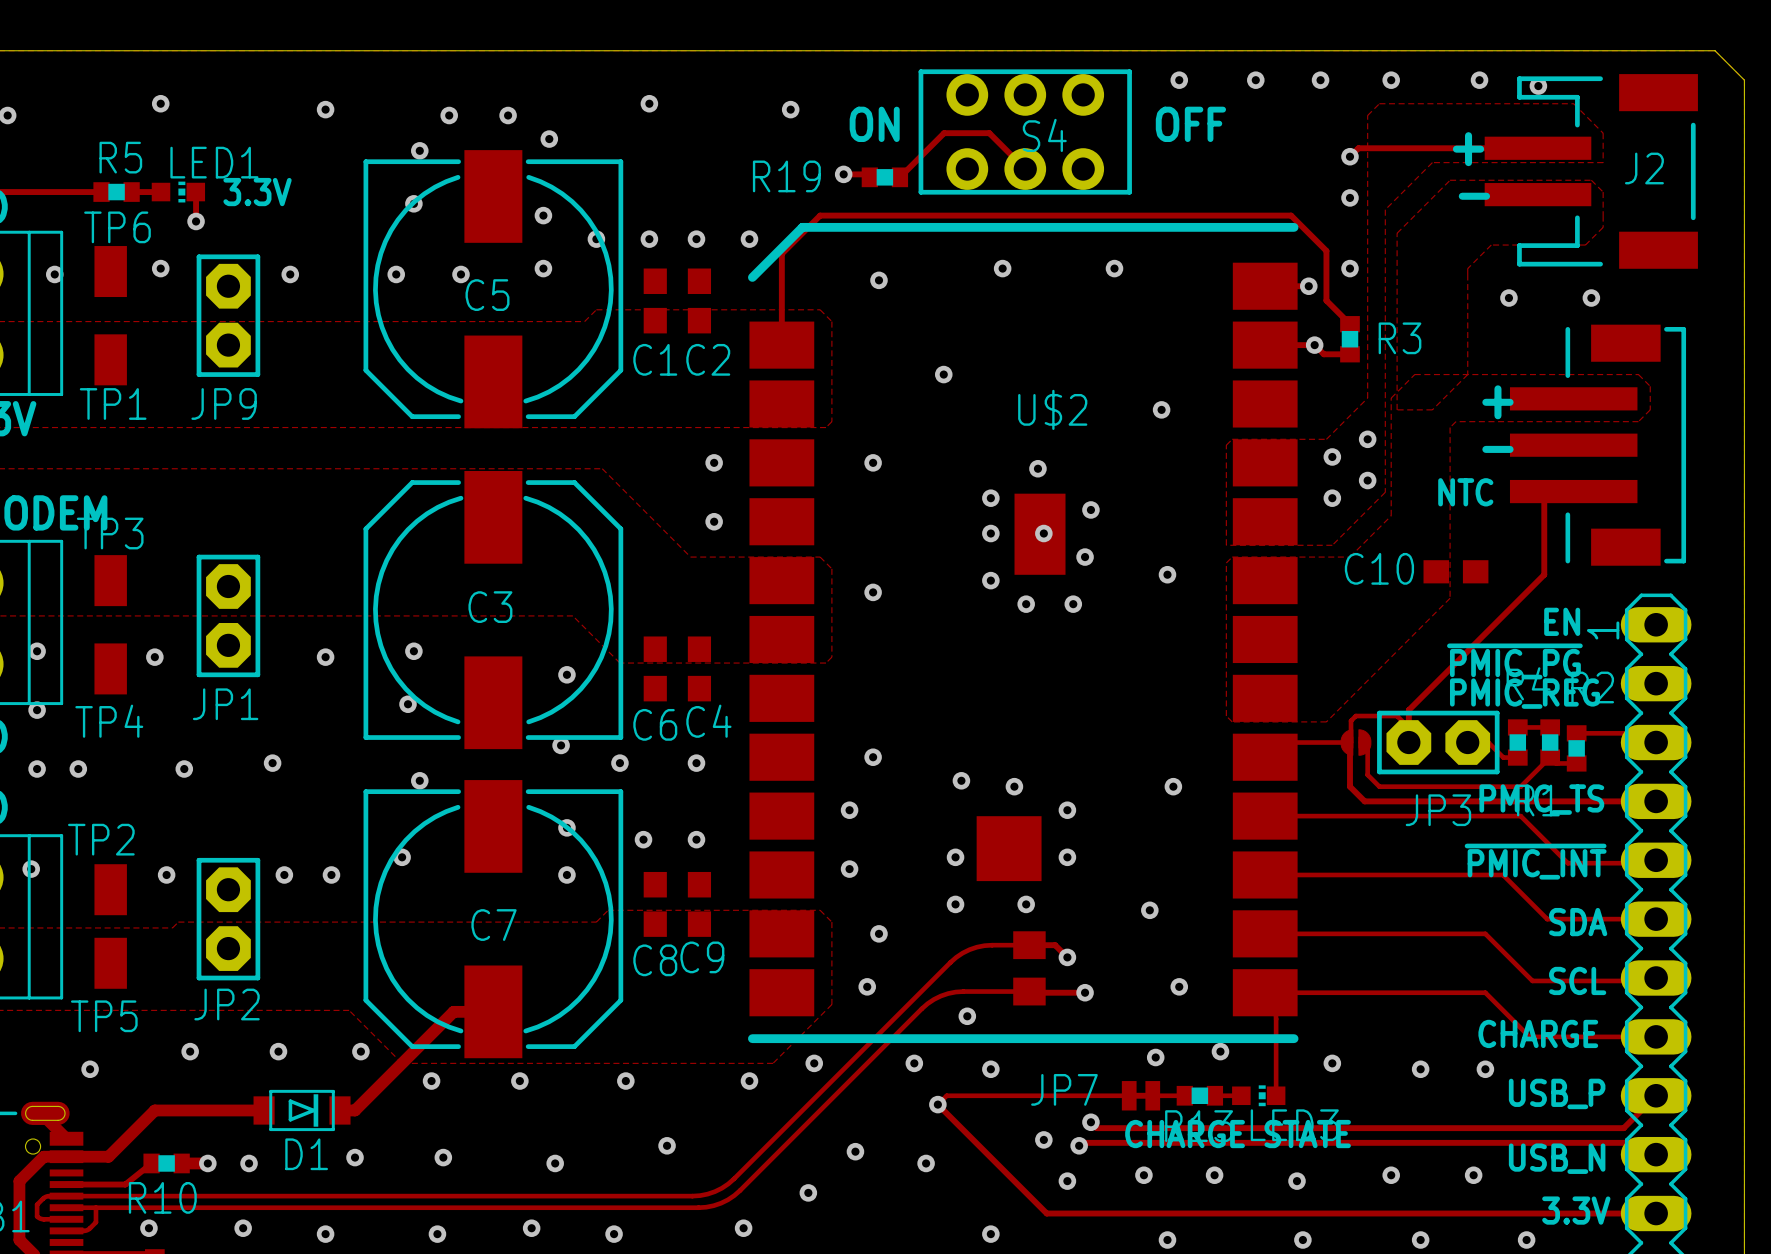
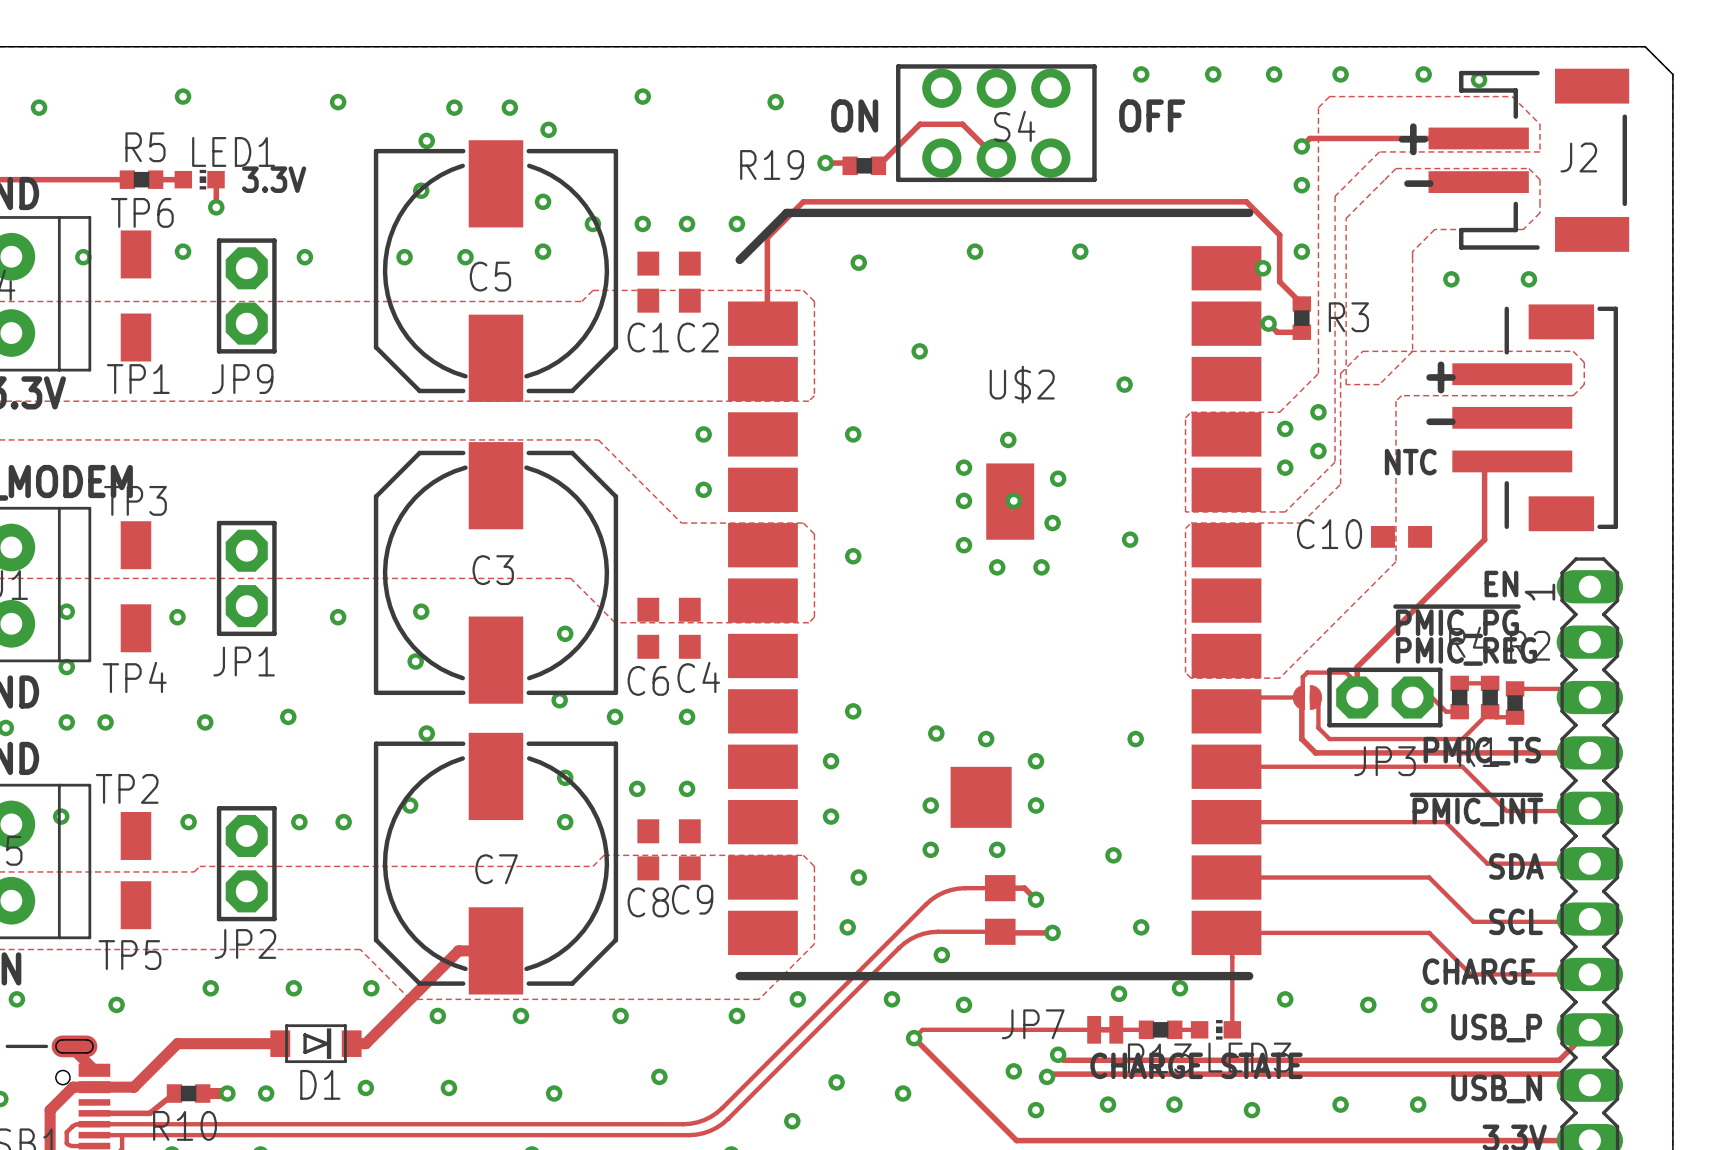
U$2 footprint: [748, 222, 1299, 1044] -> [728, 208, 1262, 981]

